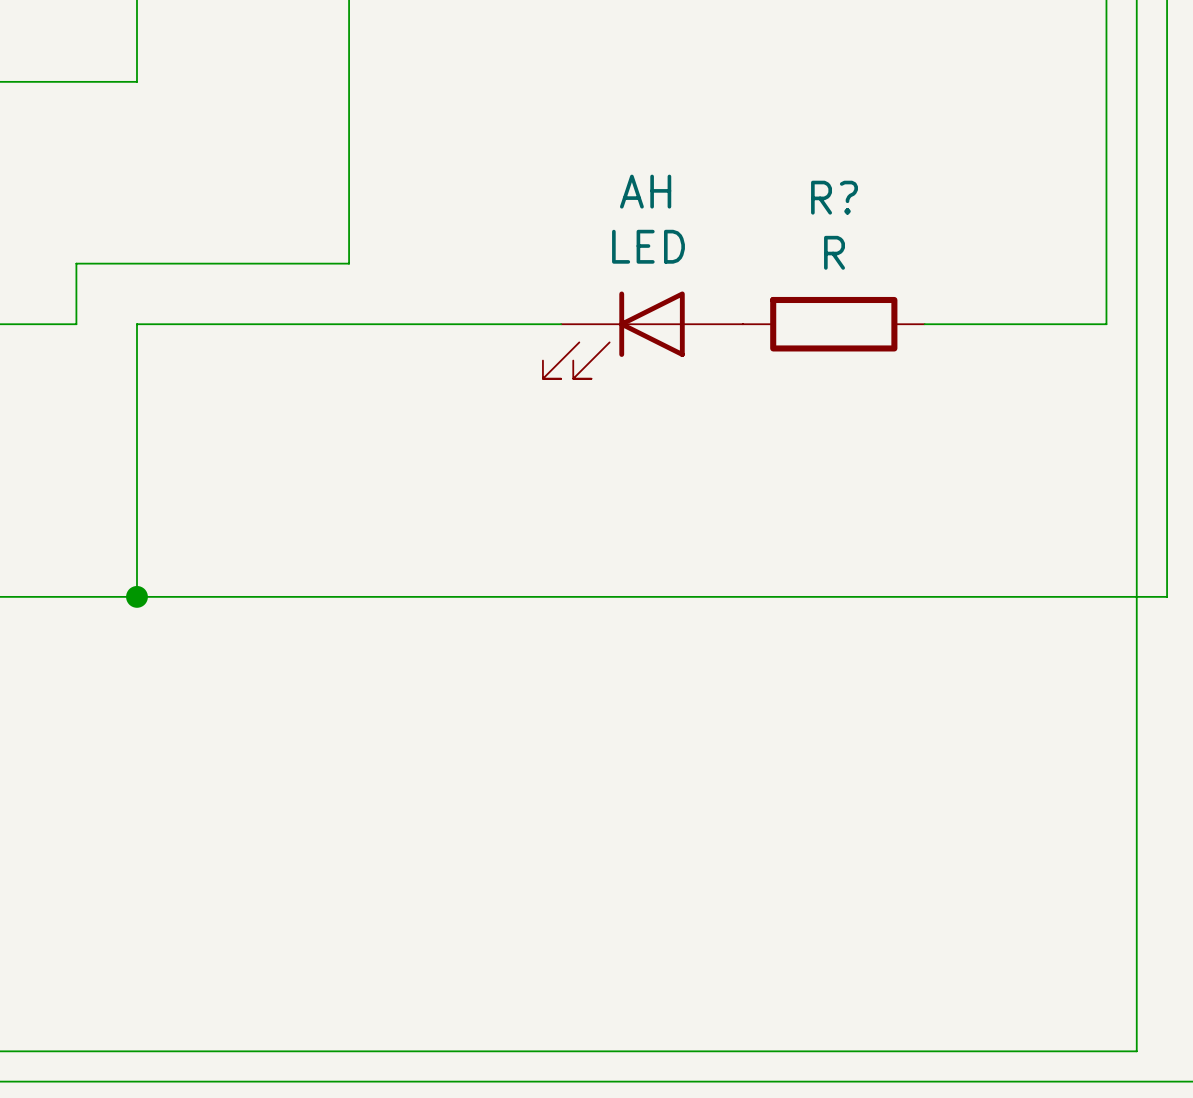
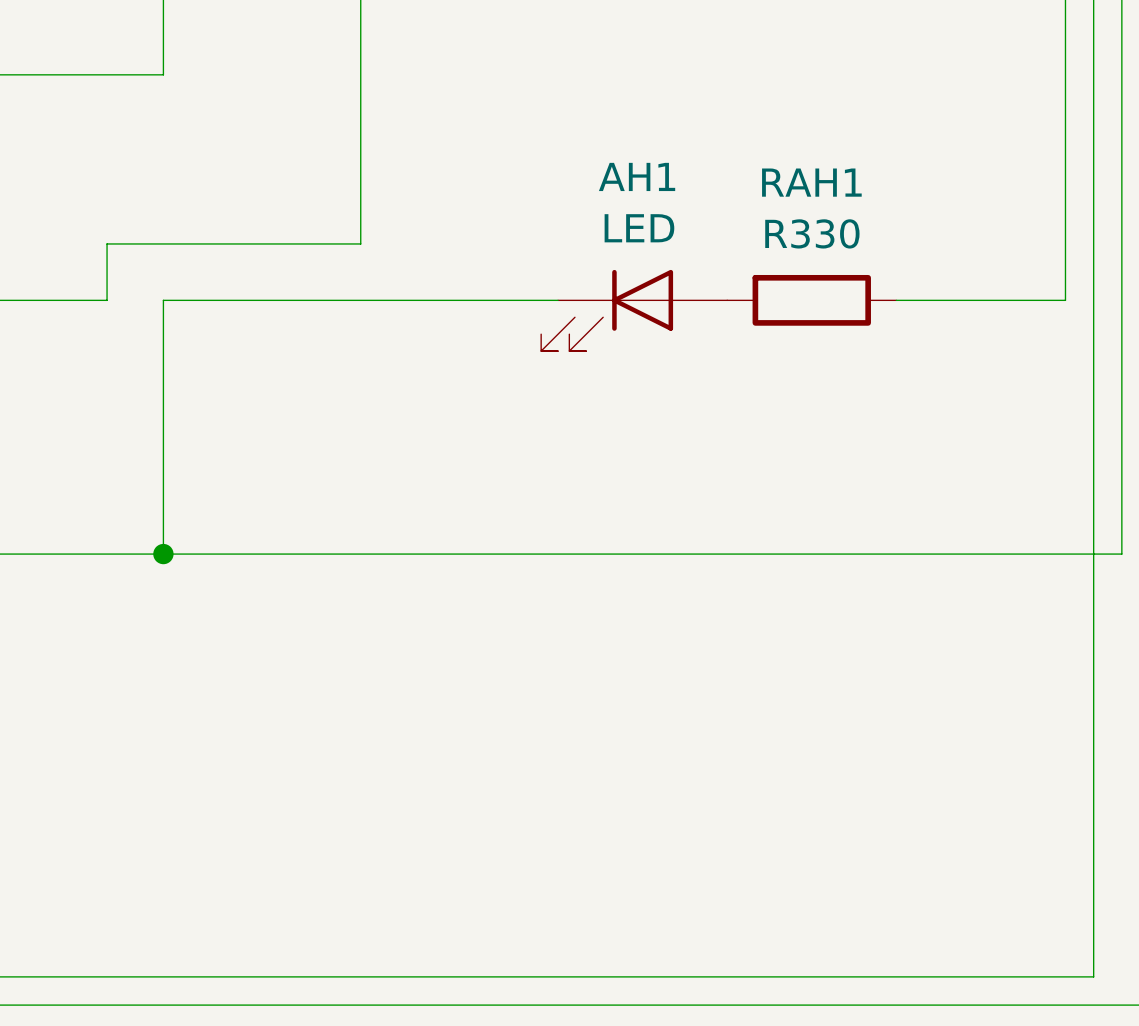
AH name: AH (645, 191) -> AH1 (637, 176)
R? name: R? (834, 197) -> RAH1 (811, 182)
R? value: R (834, 252) -> R330 (812, 233)

